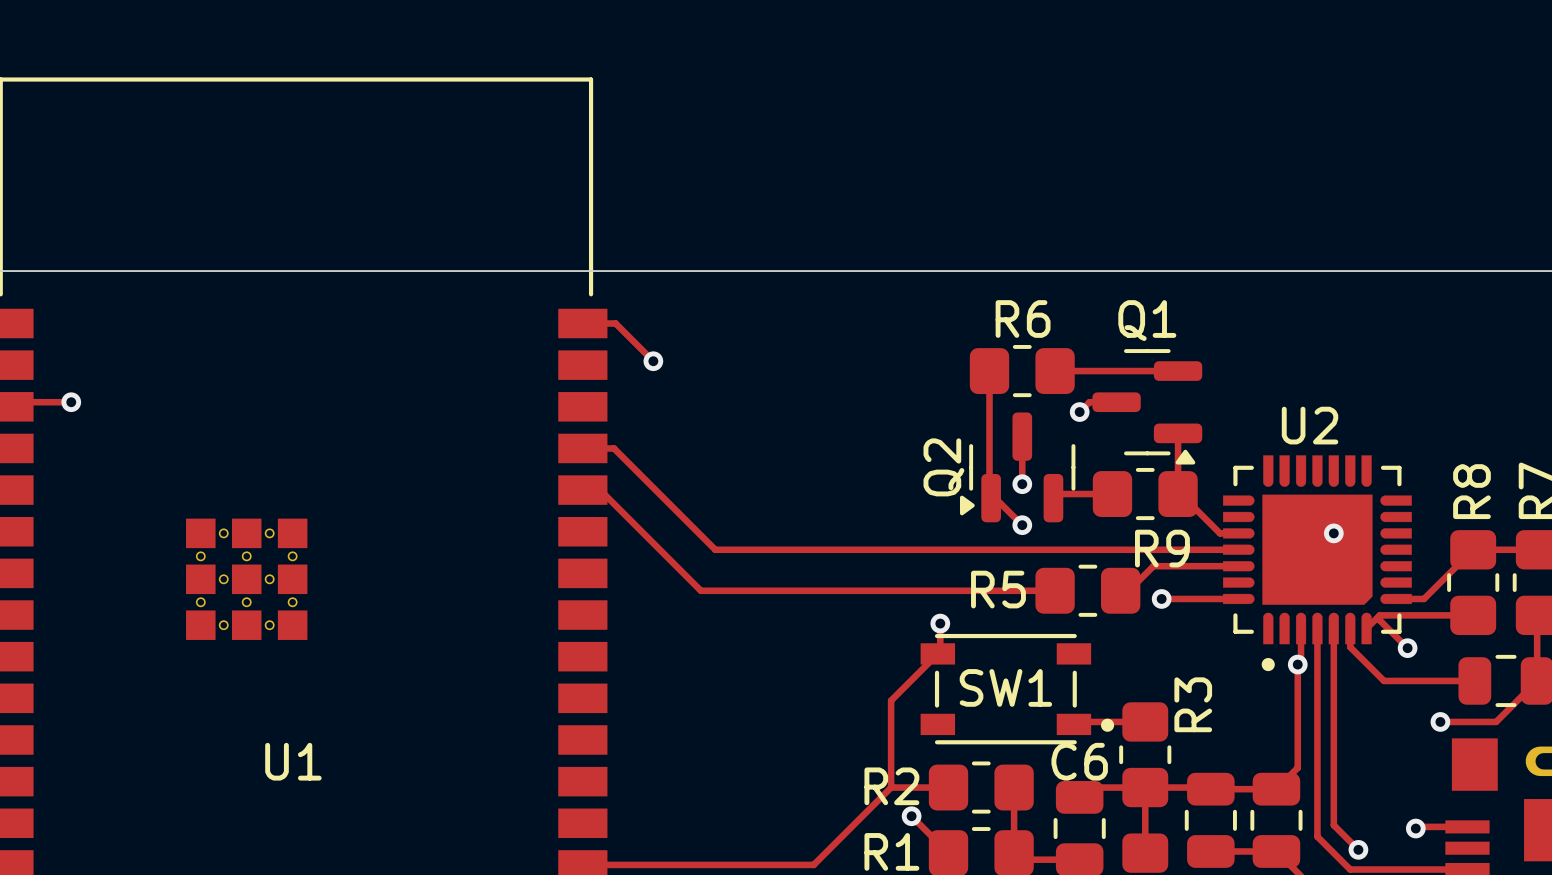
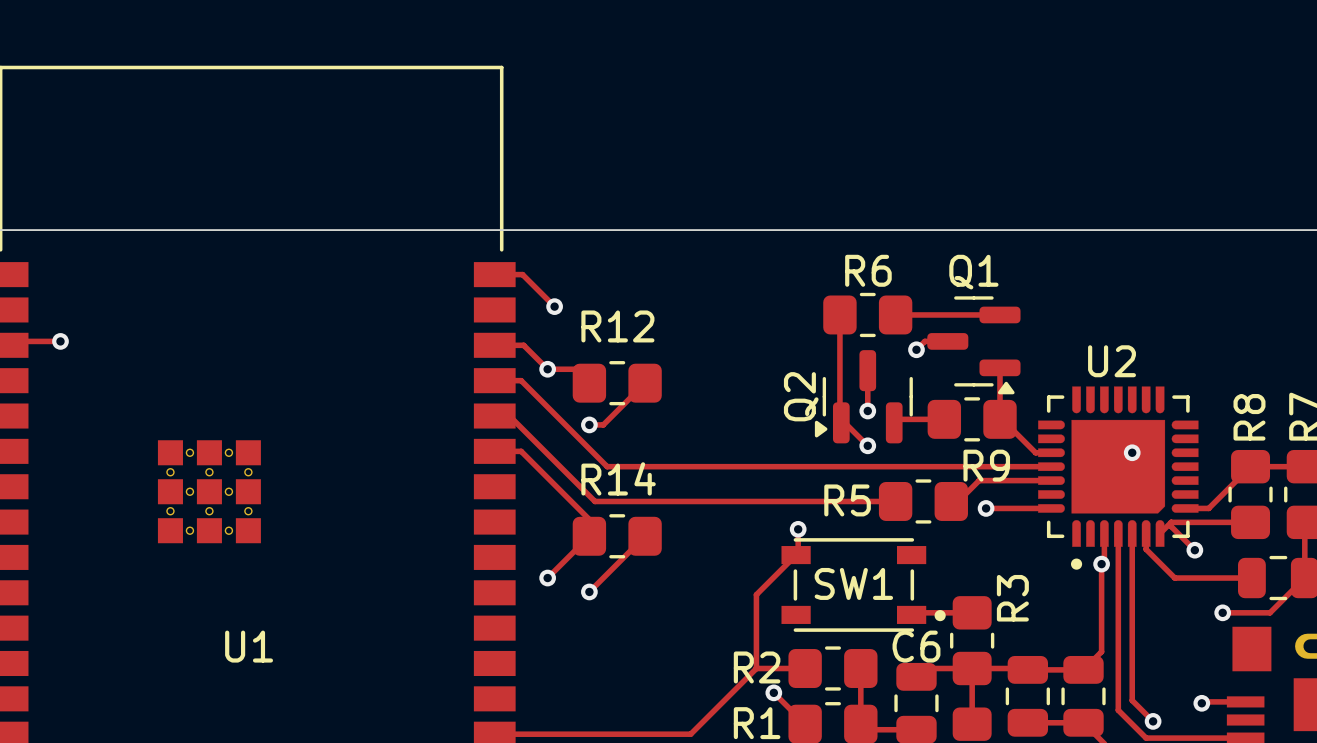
track: none -> (494, 345) (523, 345) (547, 369) (575, 369) (589, 383)
via: none -> (547, 369)
R12: none -> (617, 383)
track: none -> (645, 383) (603, 424) (589, 424)
via: none -> (589, 424)
track: none -> (494, 451) (521, 451) (589, 519) (589, 536) (547, 578)
R14: none -> (617, 536)
track: none -> (645, 536) (589, 591)
via: none -> (547, 578)
via: none -> (589, 591)

